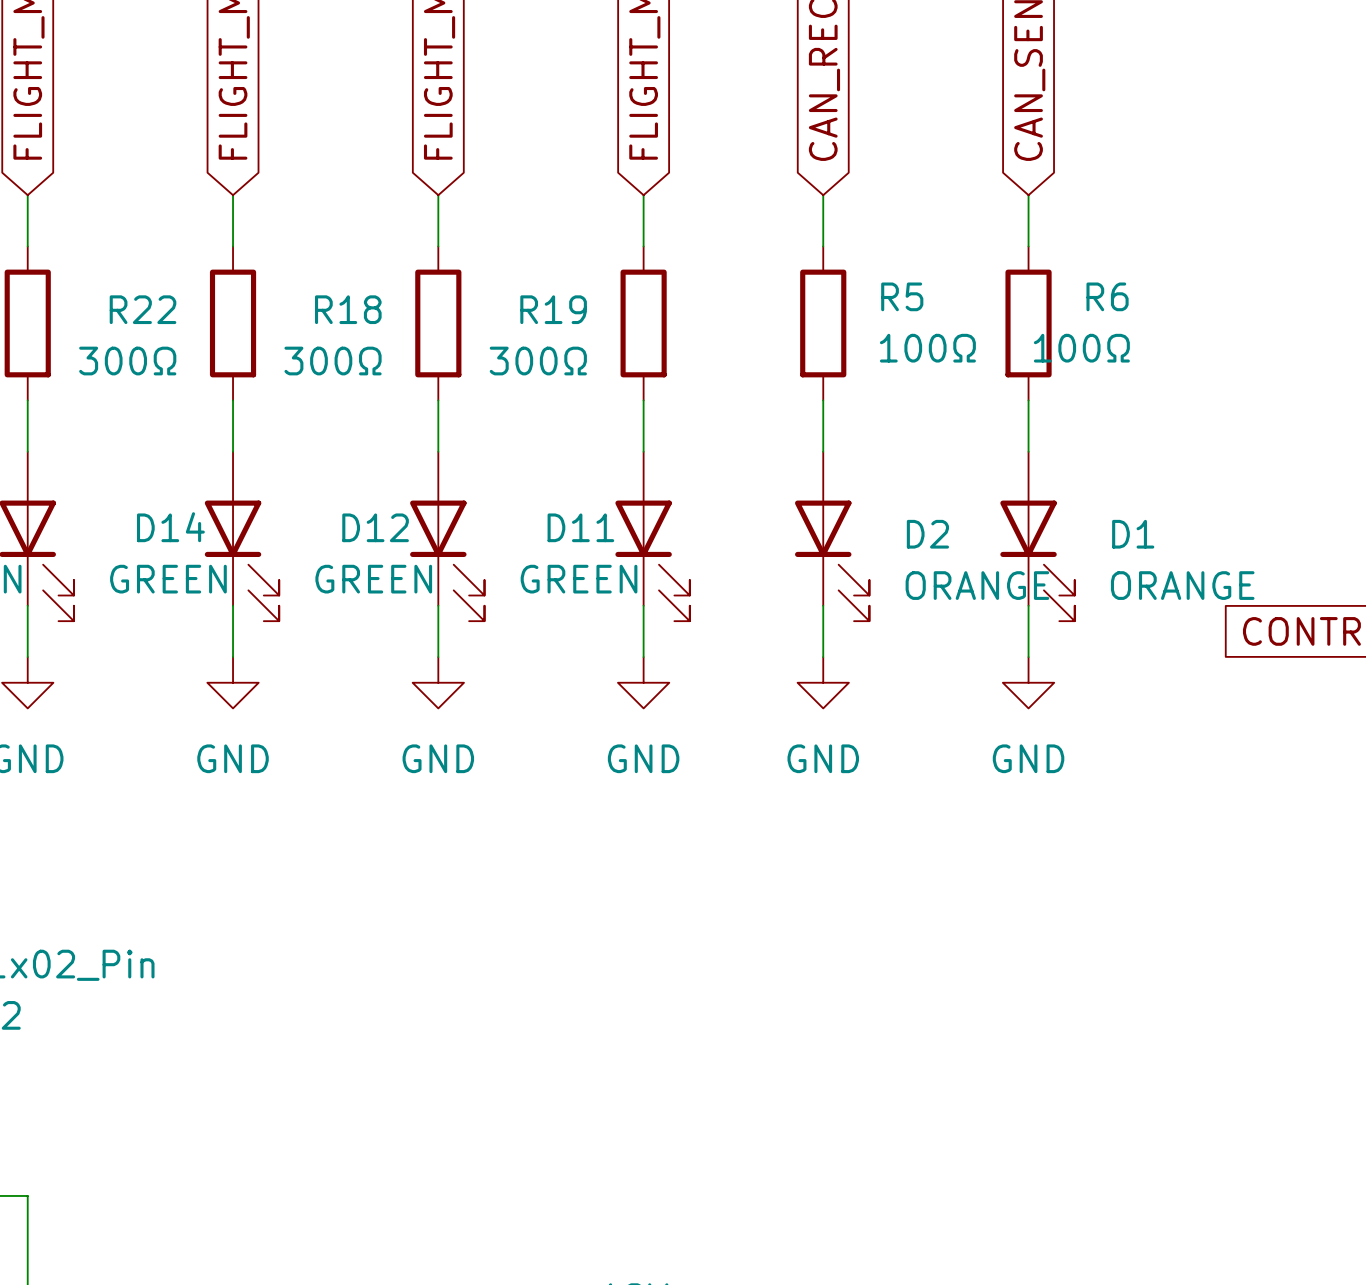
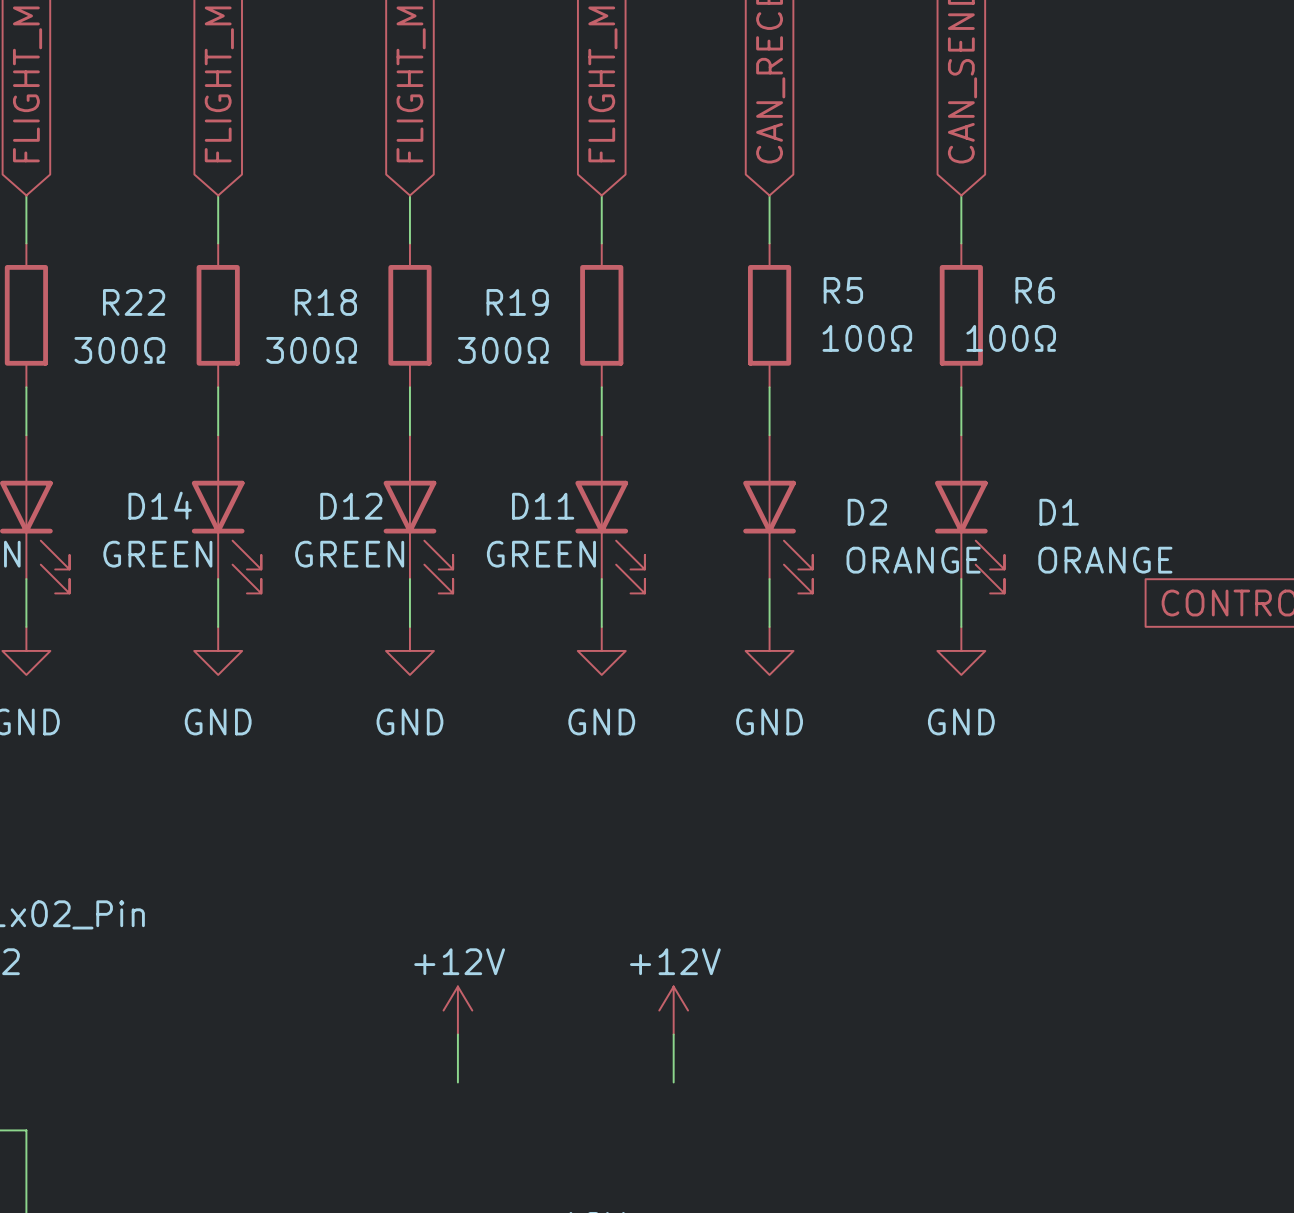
power symbol: none -> +12V (457, 1010)
power symbol: none -> +12V (673, 1010)
wire: none -> (457, 1034) (457, 1082)
wire: none -> (673, 1034) (673, 1082)

